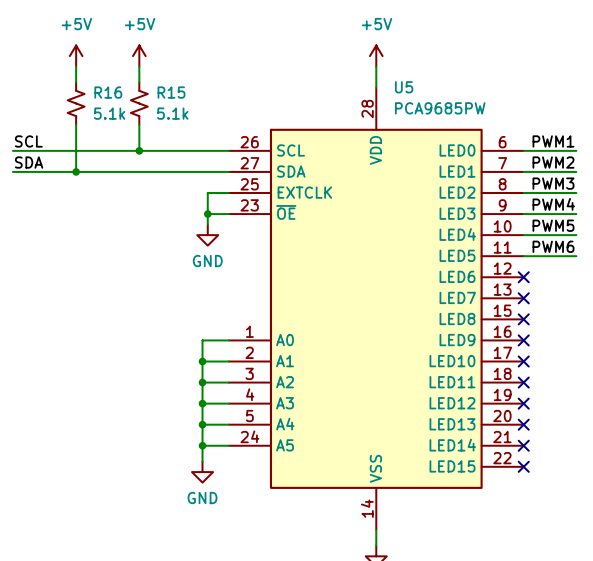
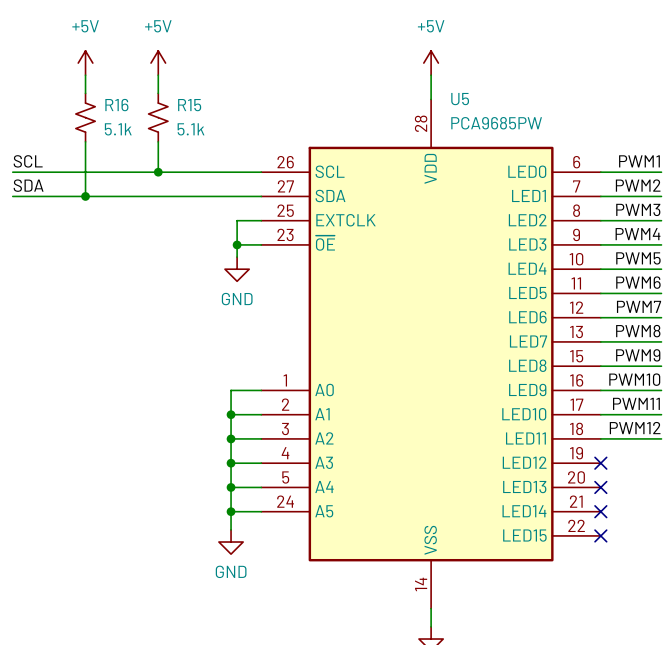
label: none -> PWM7 (639, 306)
wire: none -> (600, 317) (661, 317)
no-connect mark: (523, 277) -> none
label: none -> PWM8 (638, 331)
wire: none -> (600, 341) (661, 341)
no-connect mark: (523, 298) -> none
label: none -> PWM9 (638, 355)
wire: none -> (600, 366) (661, 366)
no-connect mark: (523, 319) -> none
label: none -> PWM10 (634, 379)
wire: none -> (600, 390) (661, 390)
no-connect mark: (523, 340) -> none
label: none -> PWM11 (636, 403)
wire: none -> (600, 414) (661, 414)
no-connect mark: (523, 361) -> none
label: none -> PWM12 (635, 428)
wire: none -> (600, 438) (661, 438)
no-connect mark: (523, 382) -> none

